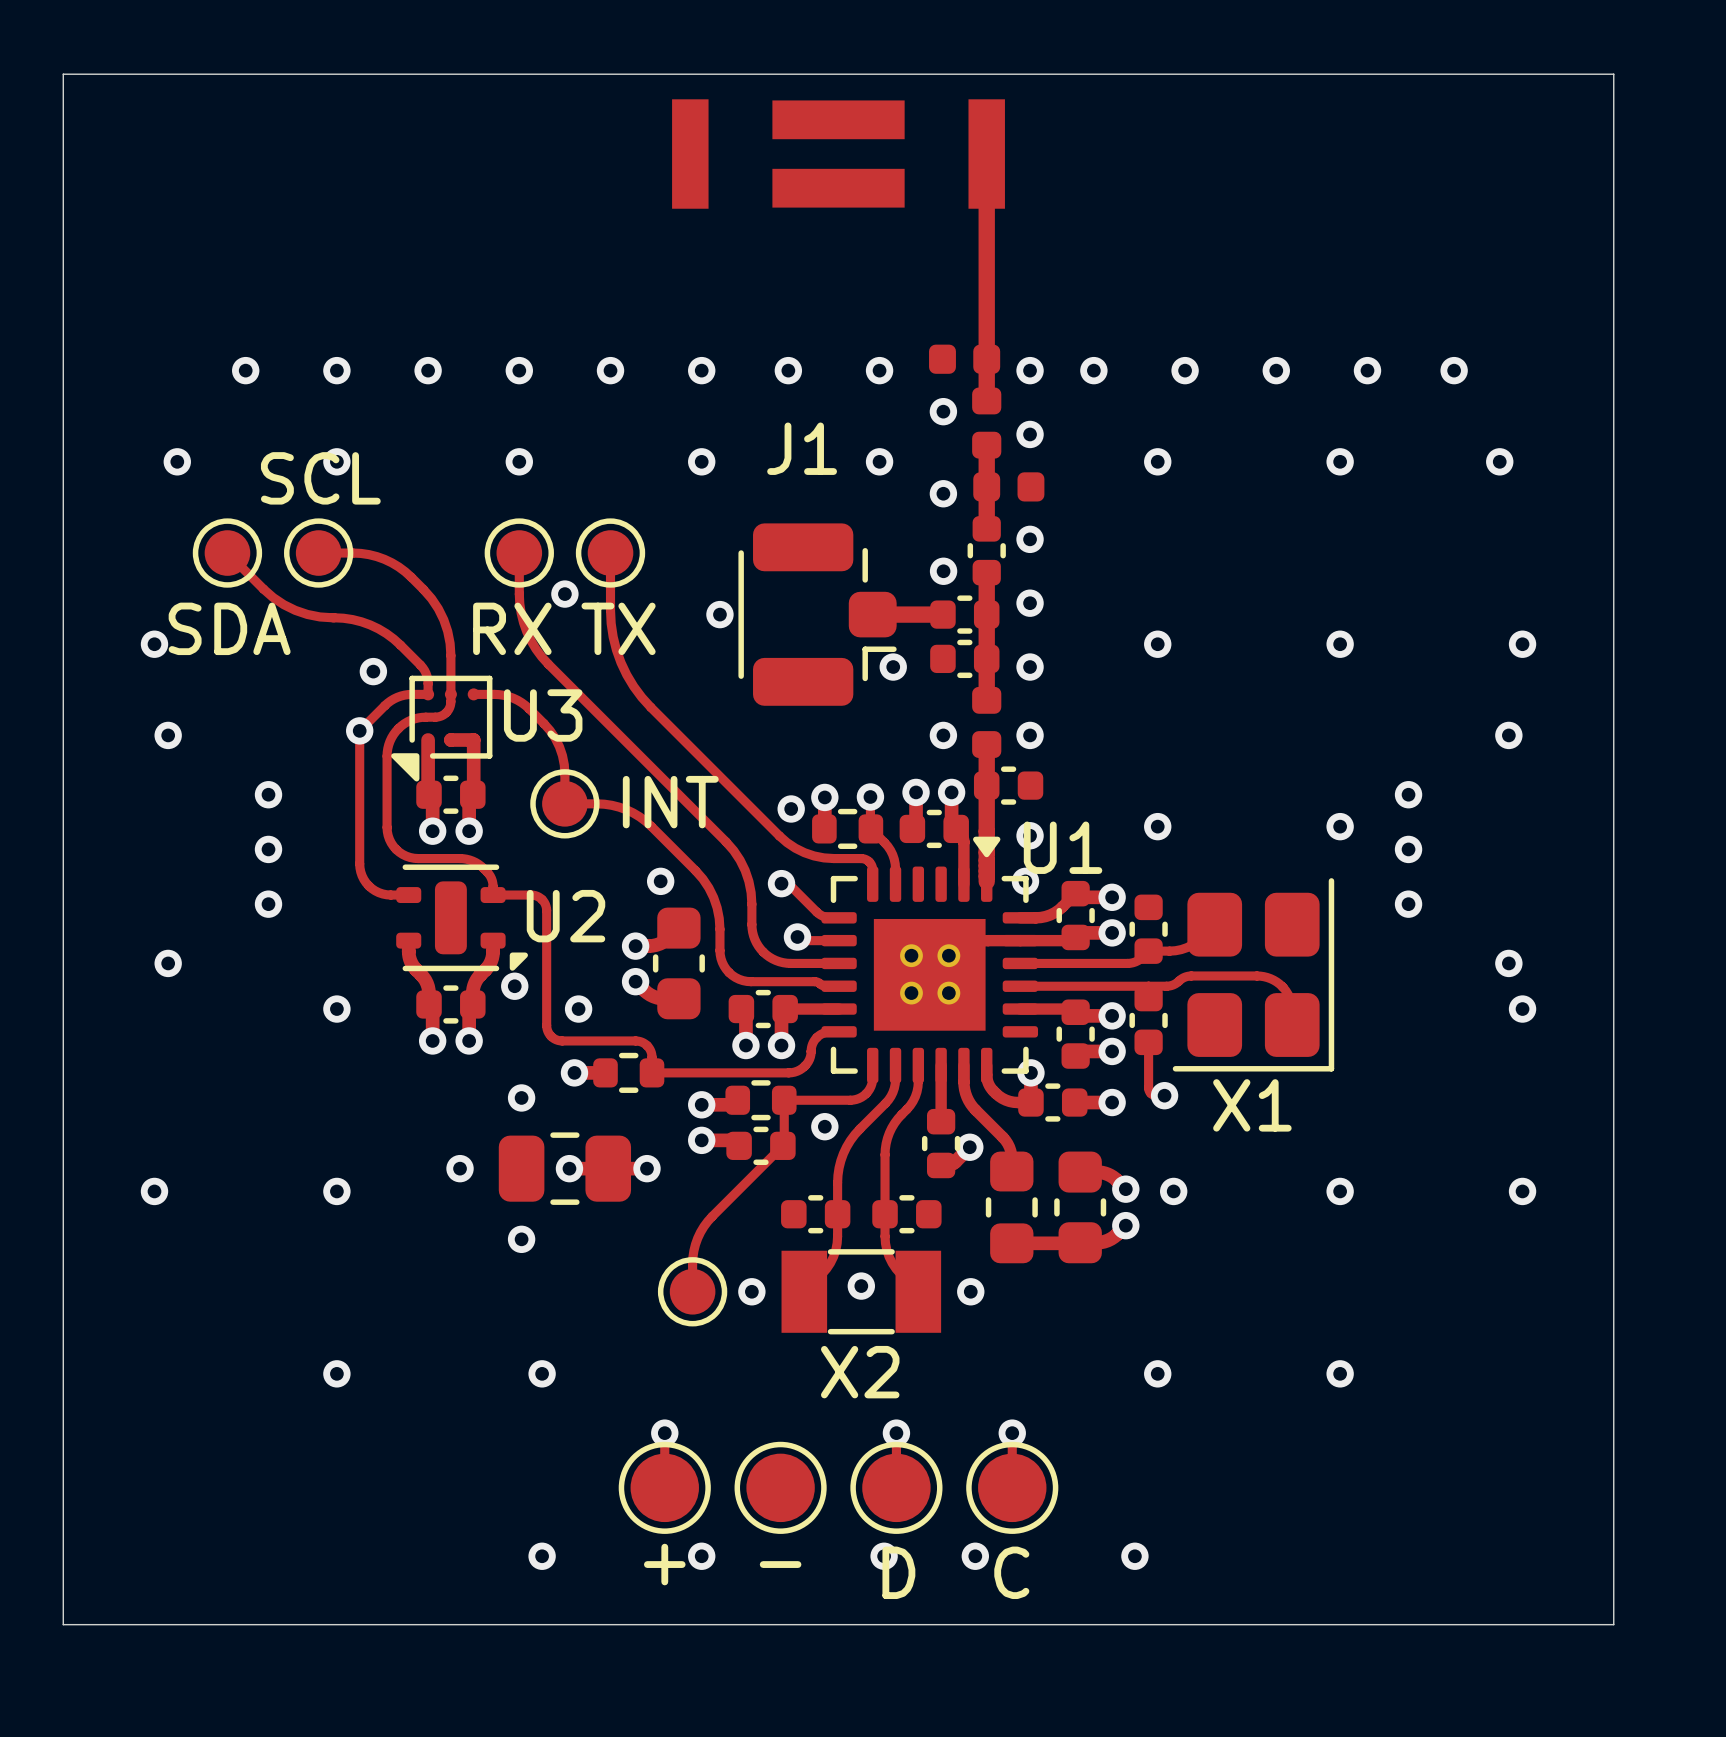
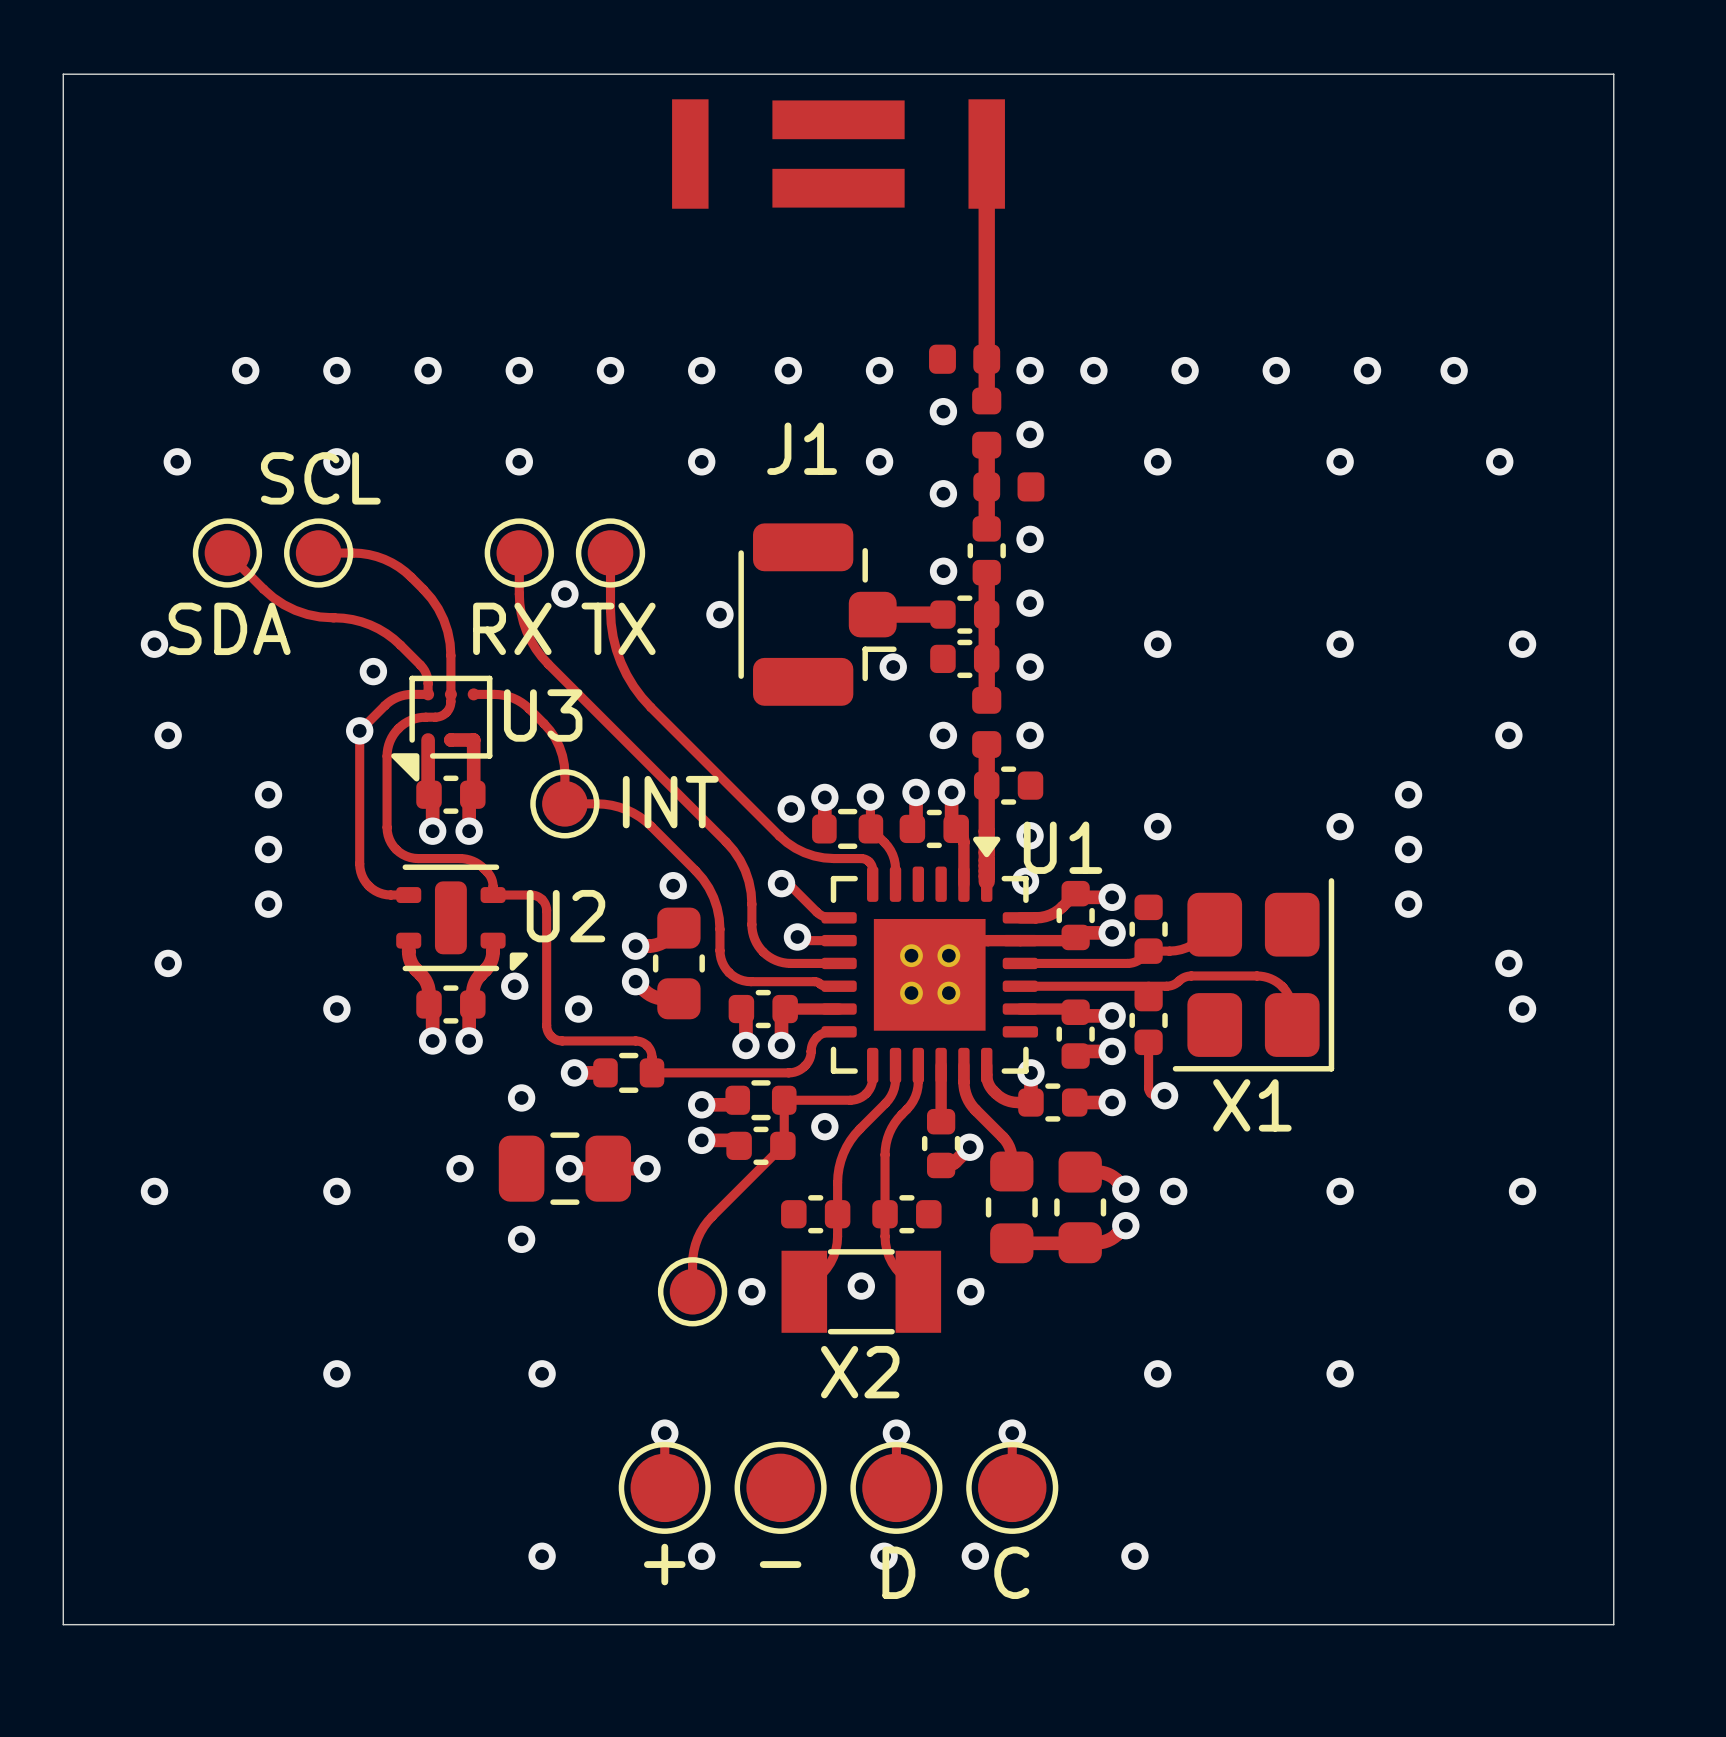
via position: (660, 881) -> (673, 885)

